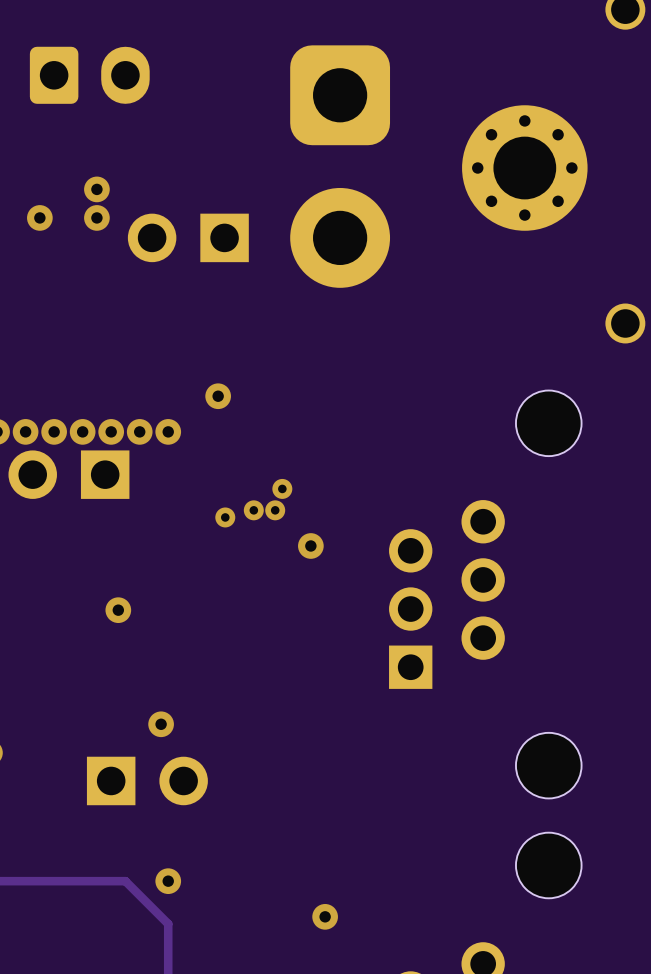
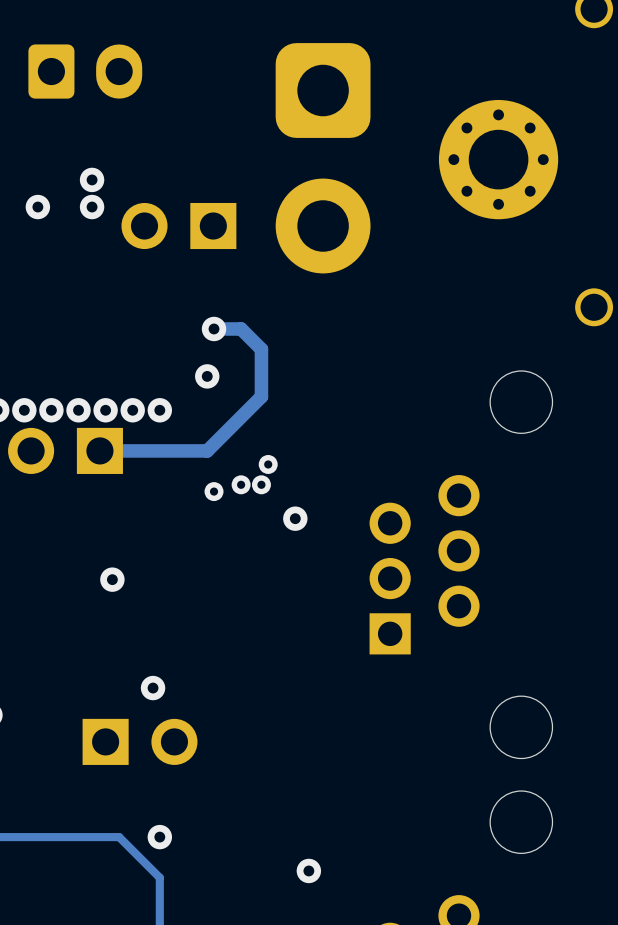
track: none -> (214, 328) (241, 328) (261, 349) (261, 396) (207, 450) (99, 450)
via: none -> (214, 328)

